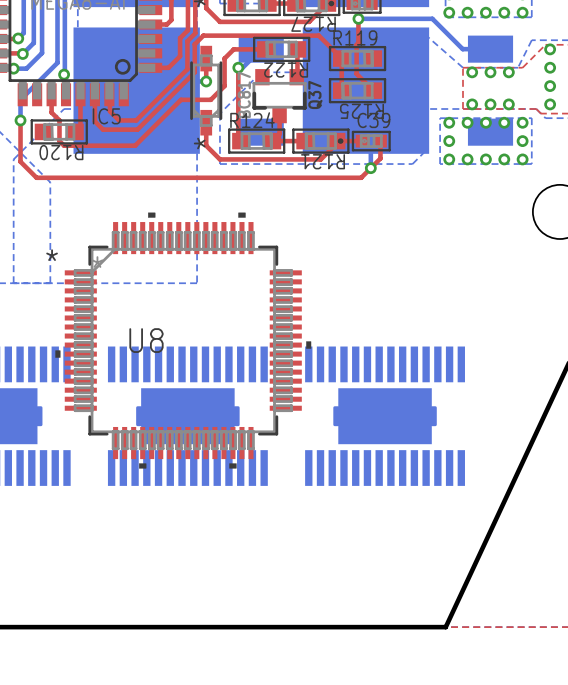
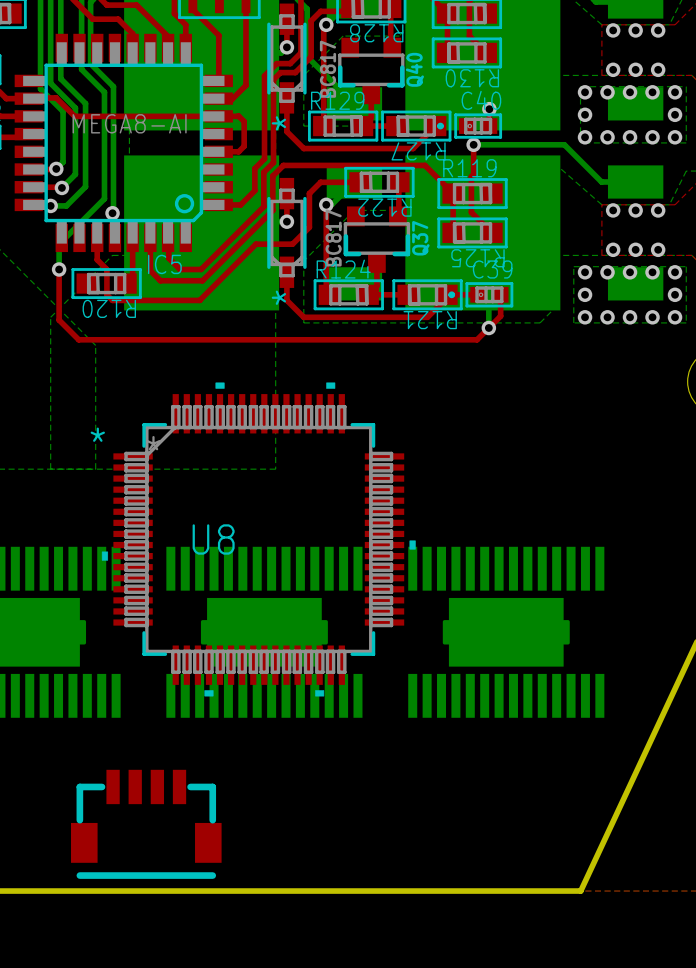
part: none -> (146, 824)

